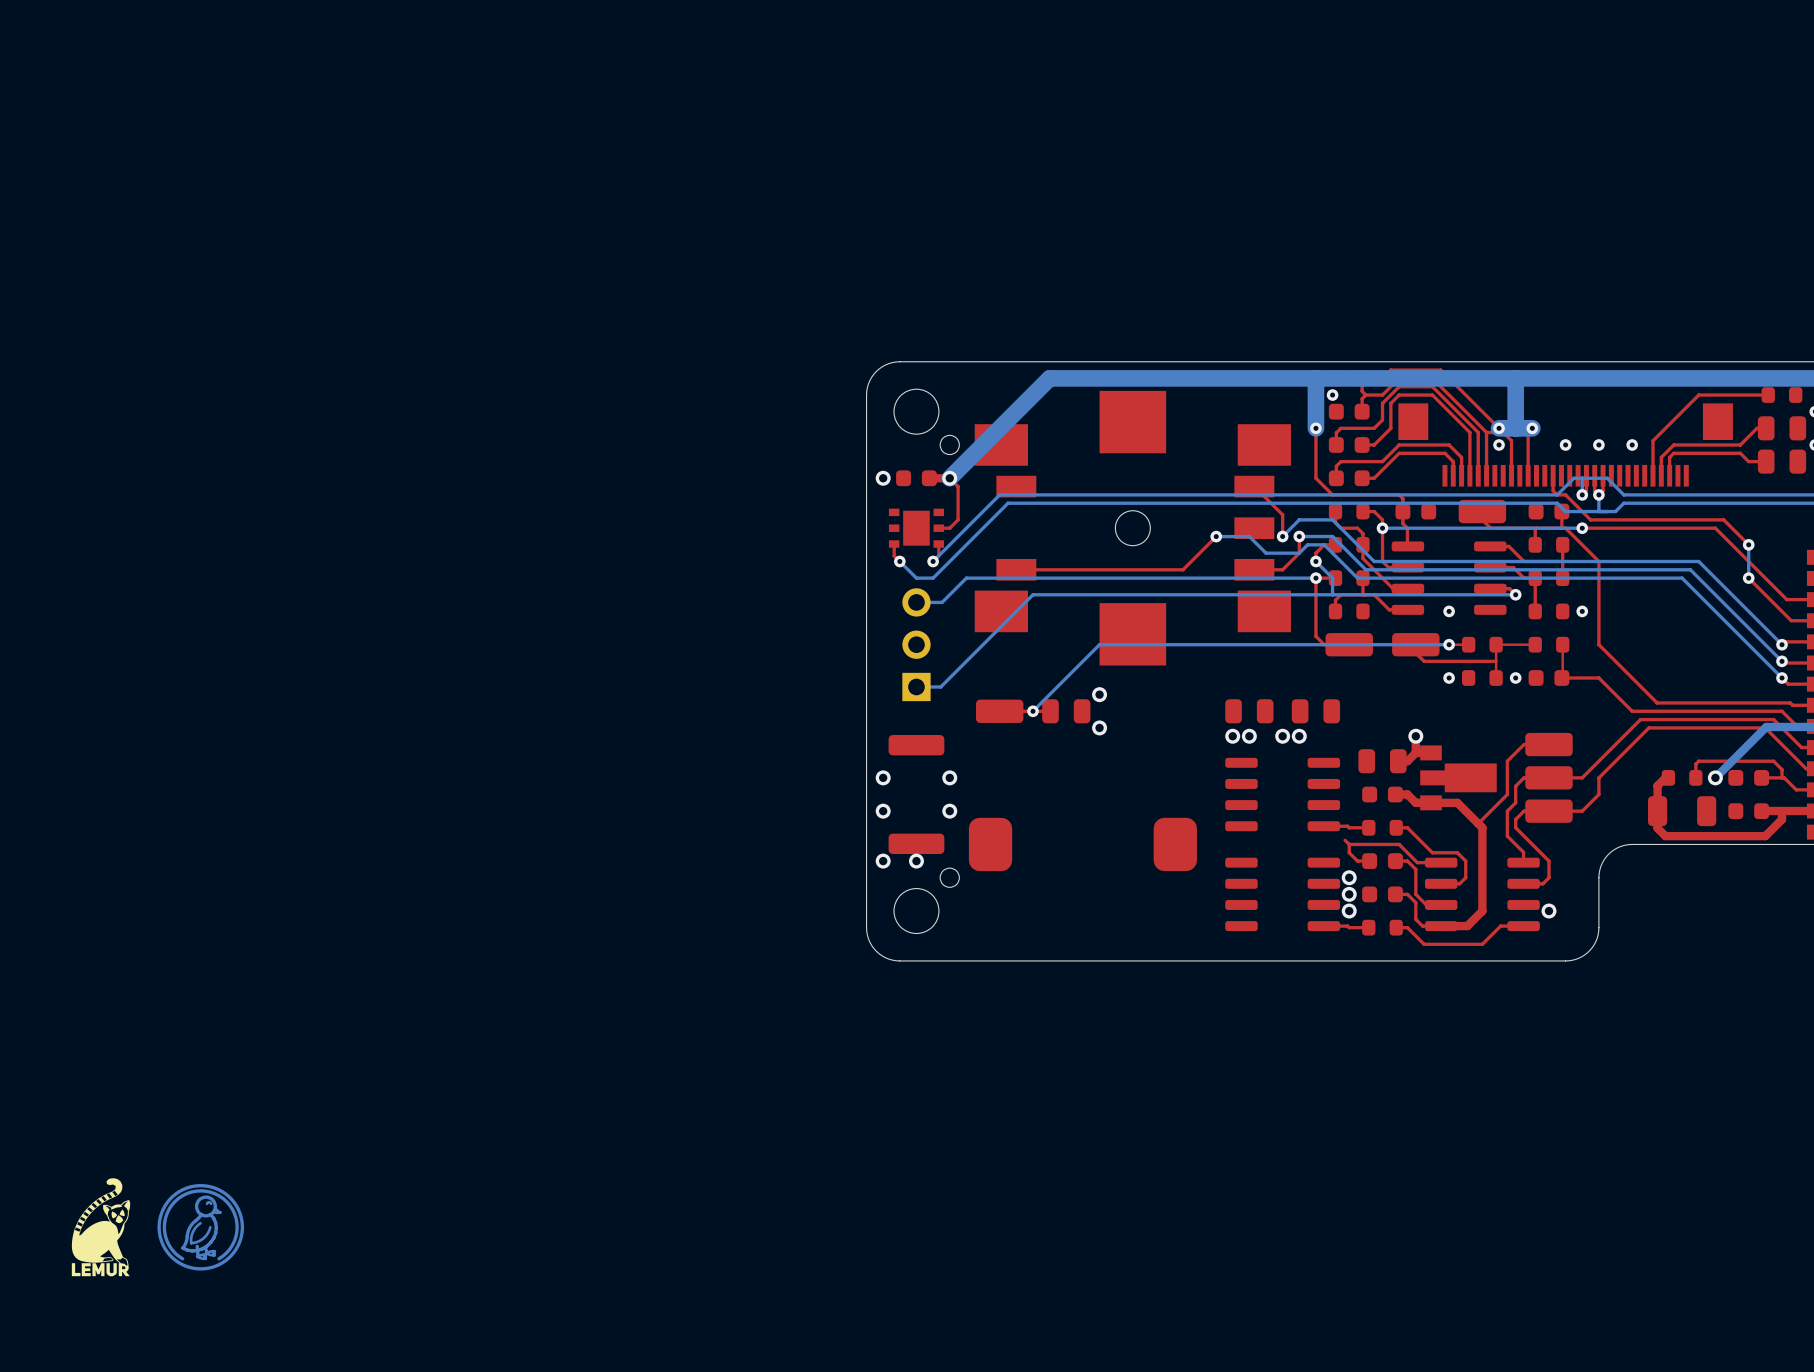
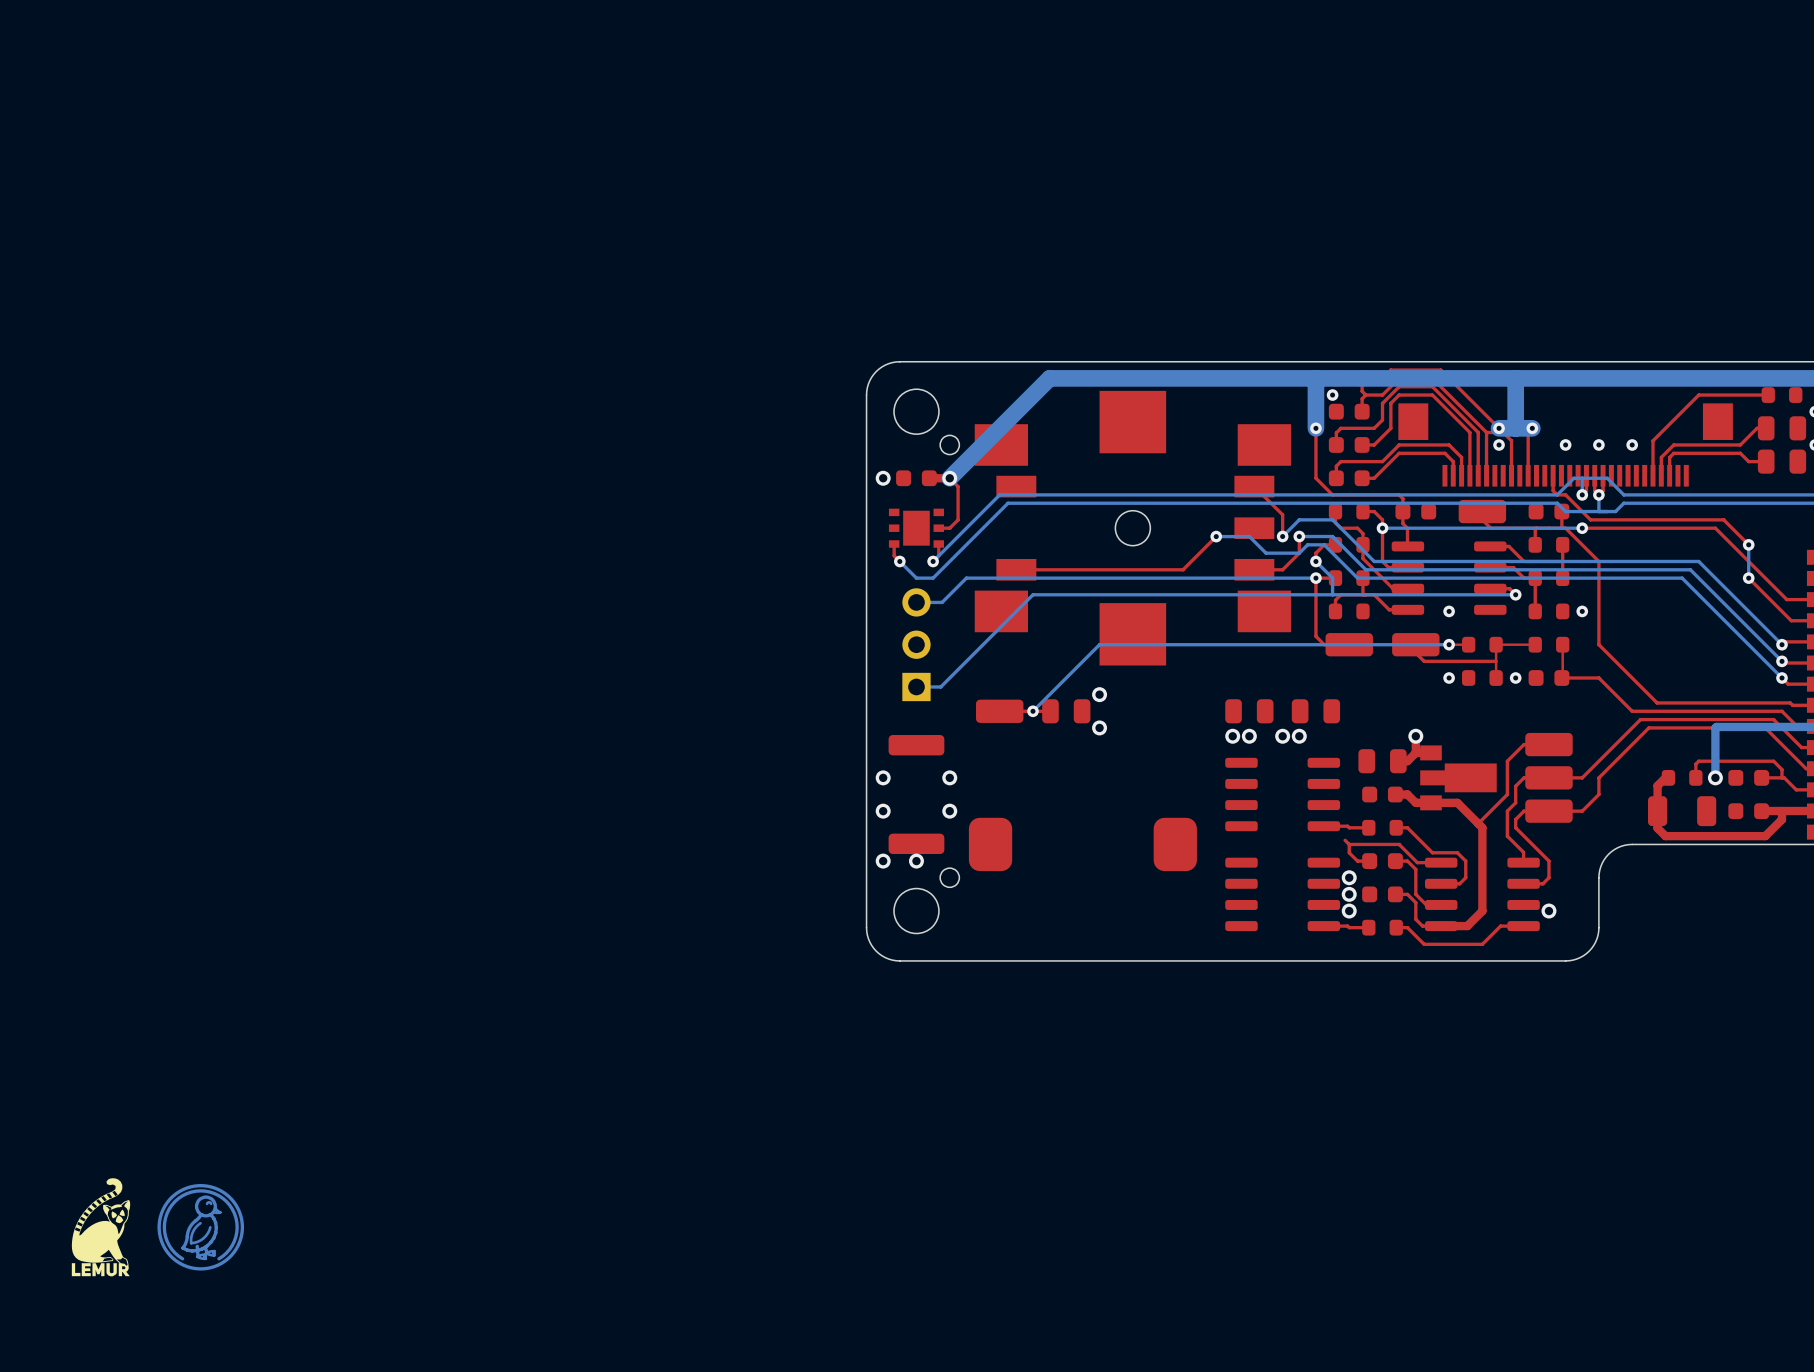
bottom track: (1766, 726) (1715, 777) -> (1766, 726) (1716, 726) (1715, 777)

